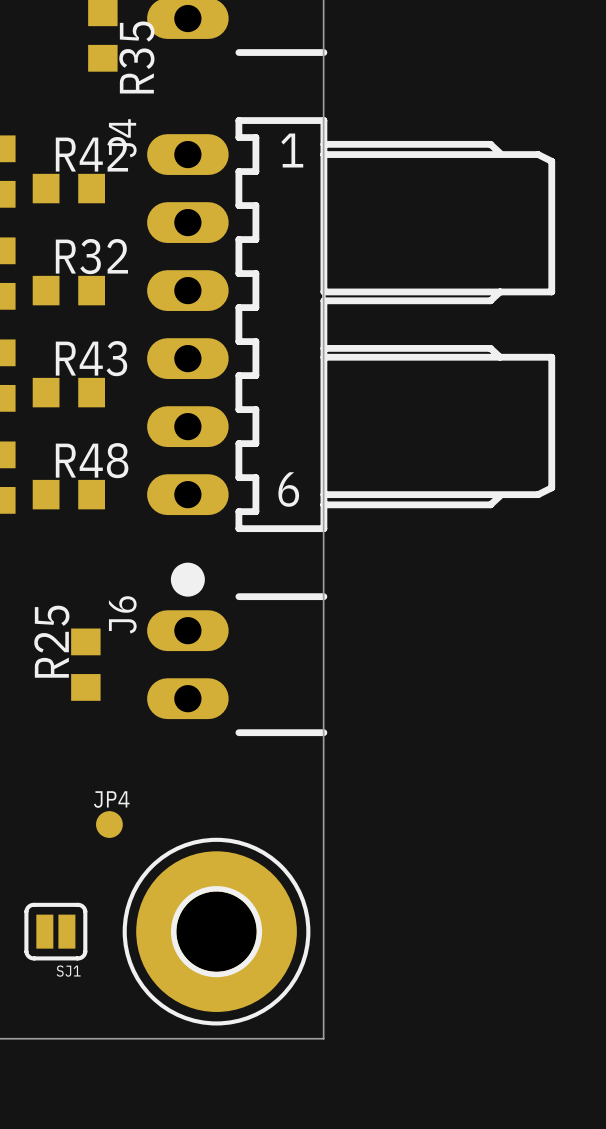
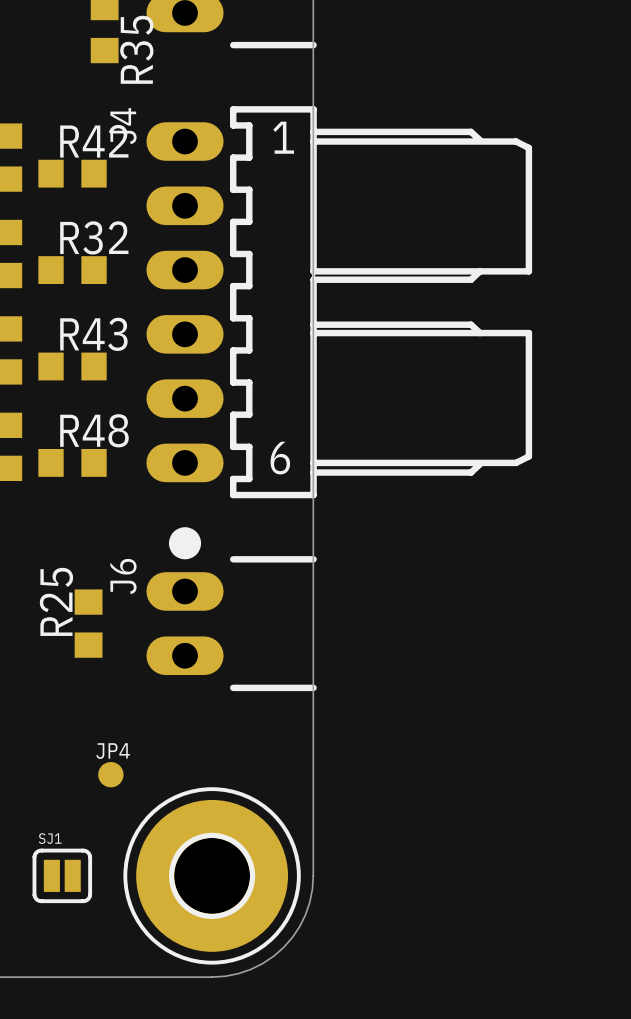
SJ1 rotation: 0° (55, 931) -> 180° (62, 875)
board edge: (323, 931) (323, 1038) (216, 1038) -> (313, 875) (312, 889) (305, 914) (299, 926) (283, 947) (262, 963) (250, 969) (225, 976) (212, 977)

